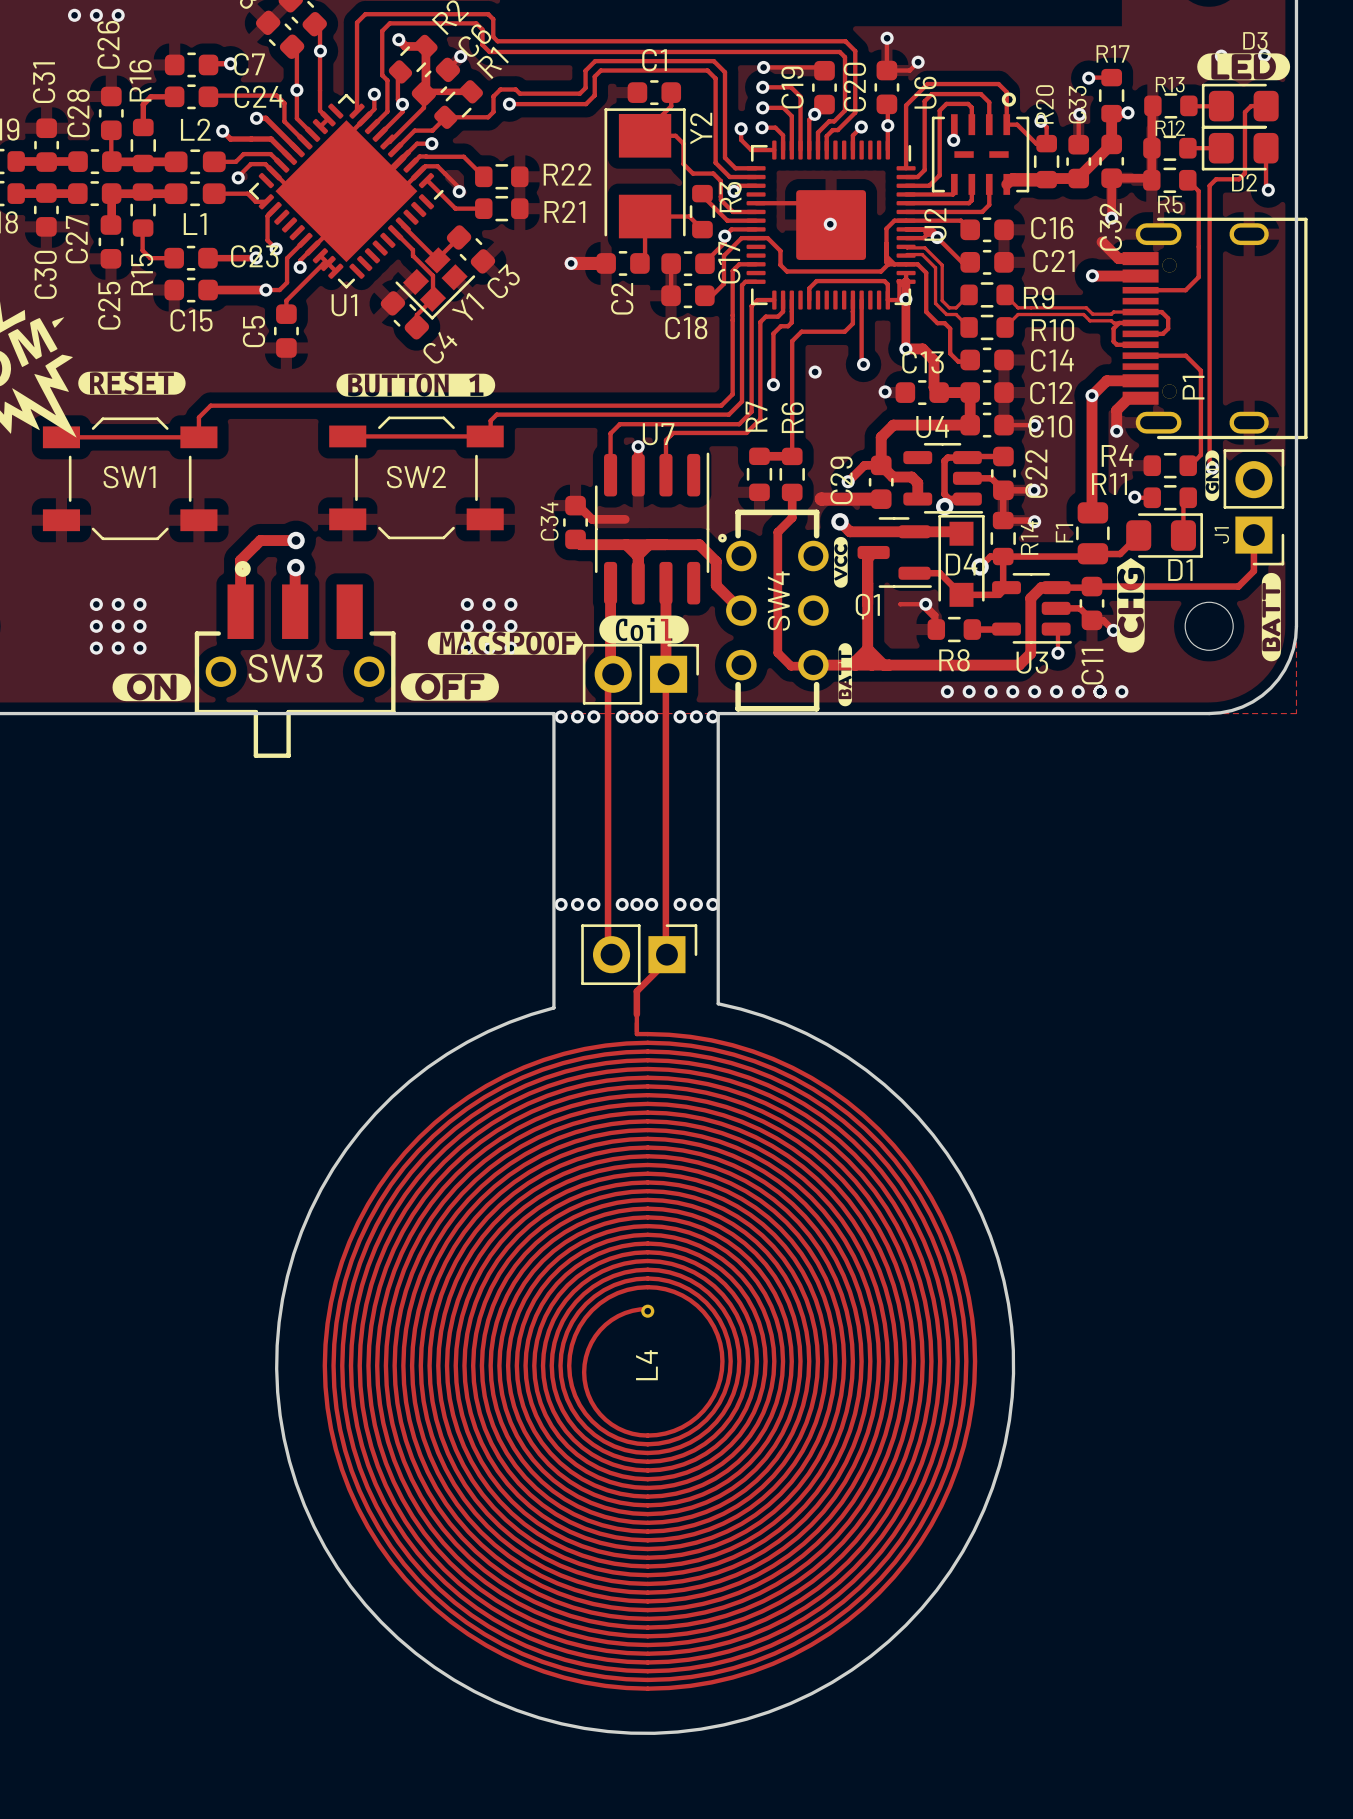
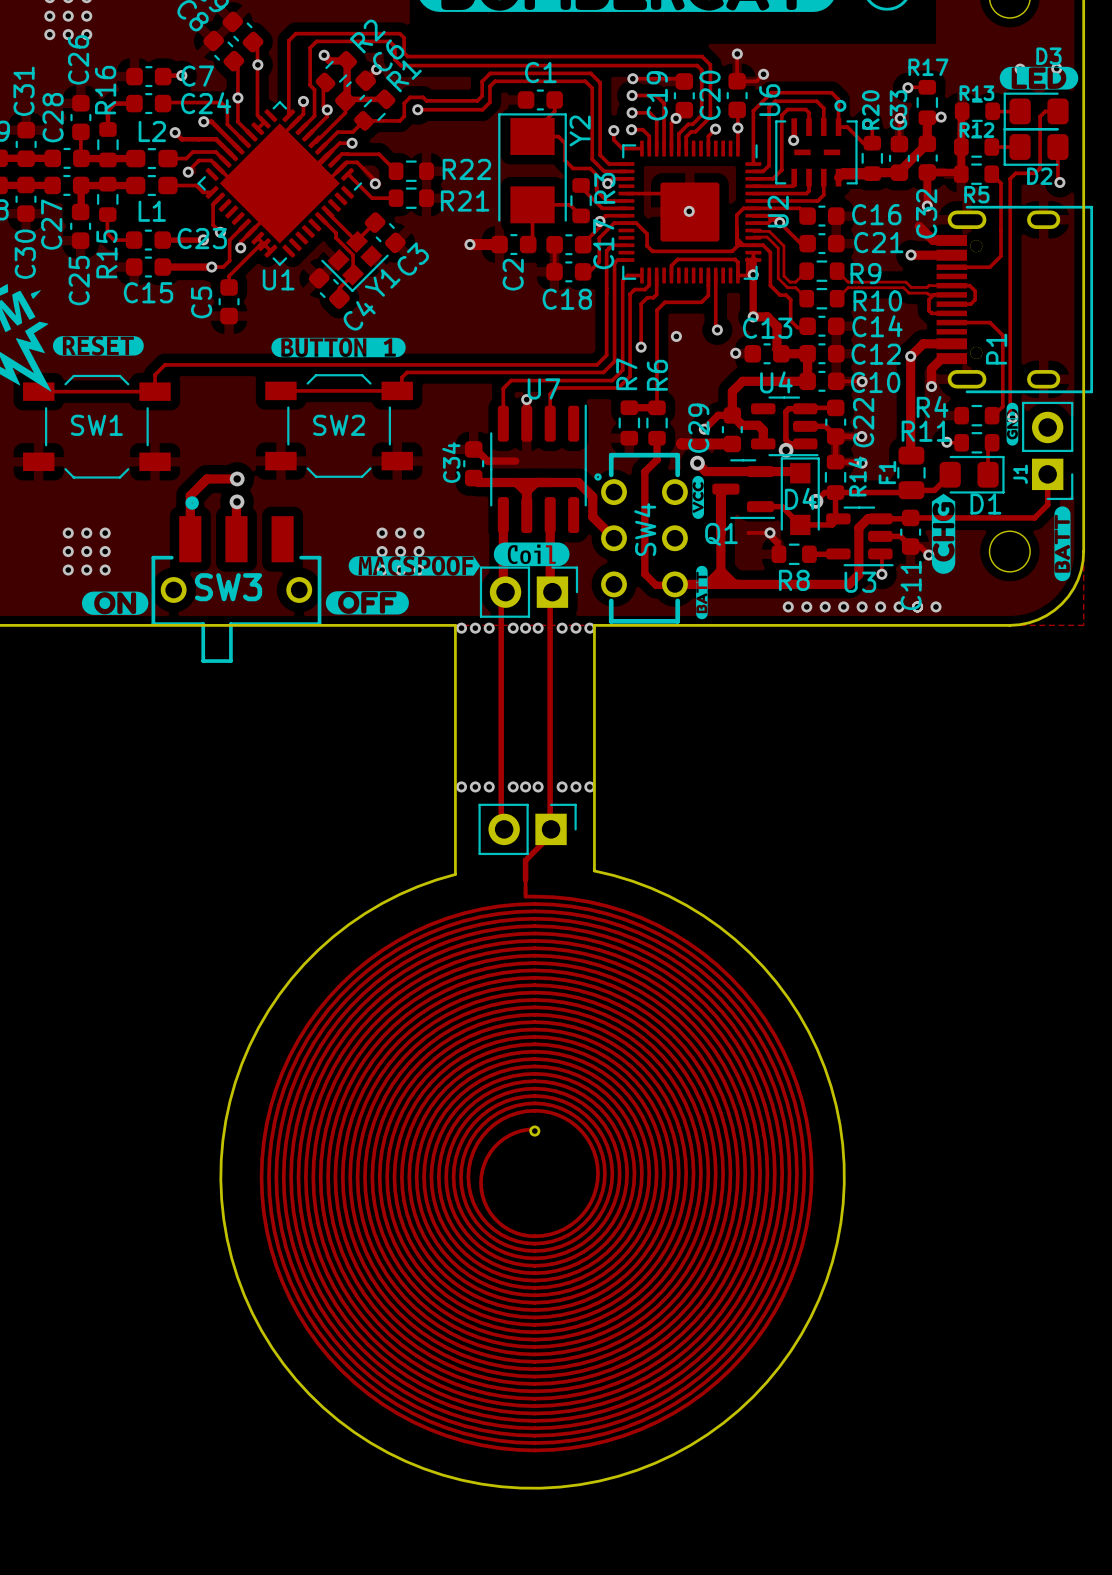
L4 name: L4 (646, 1365) -> none

